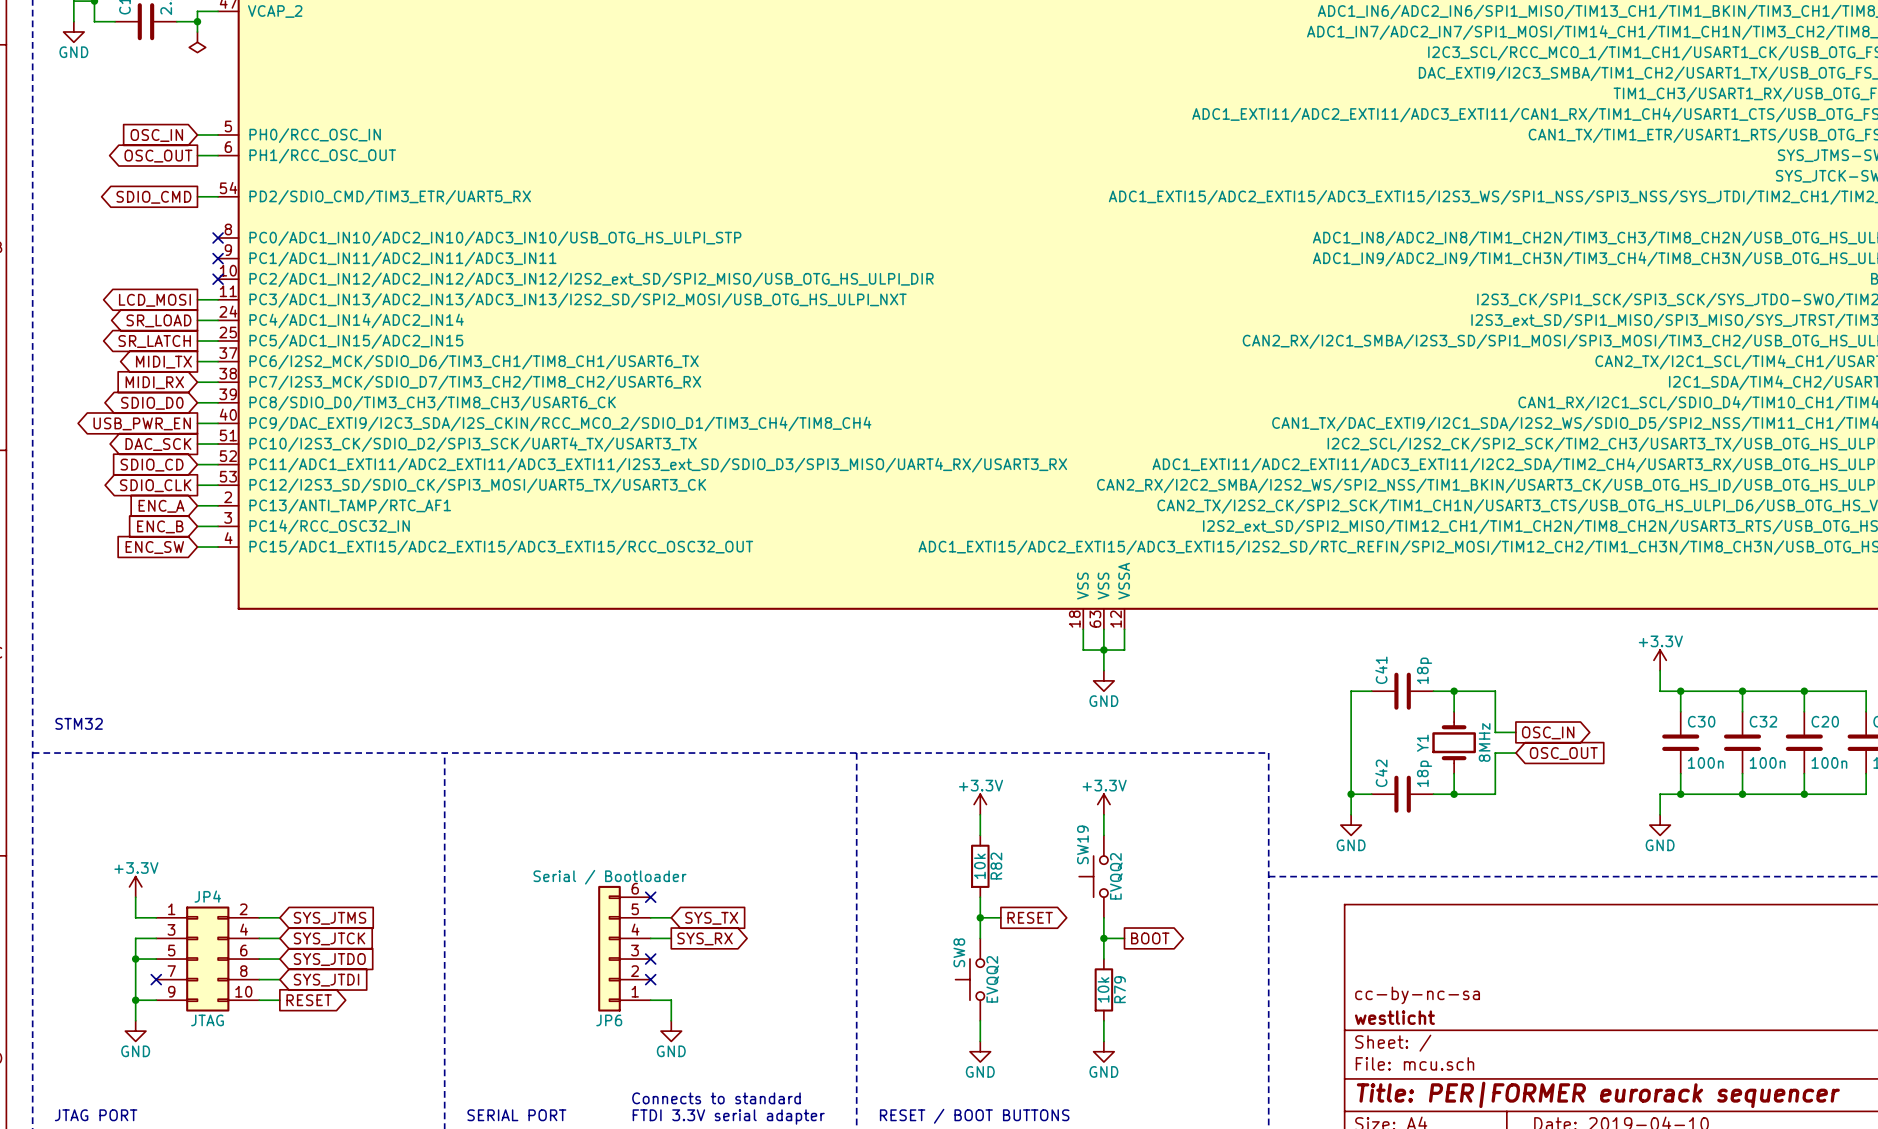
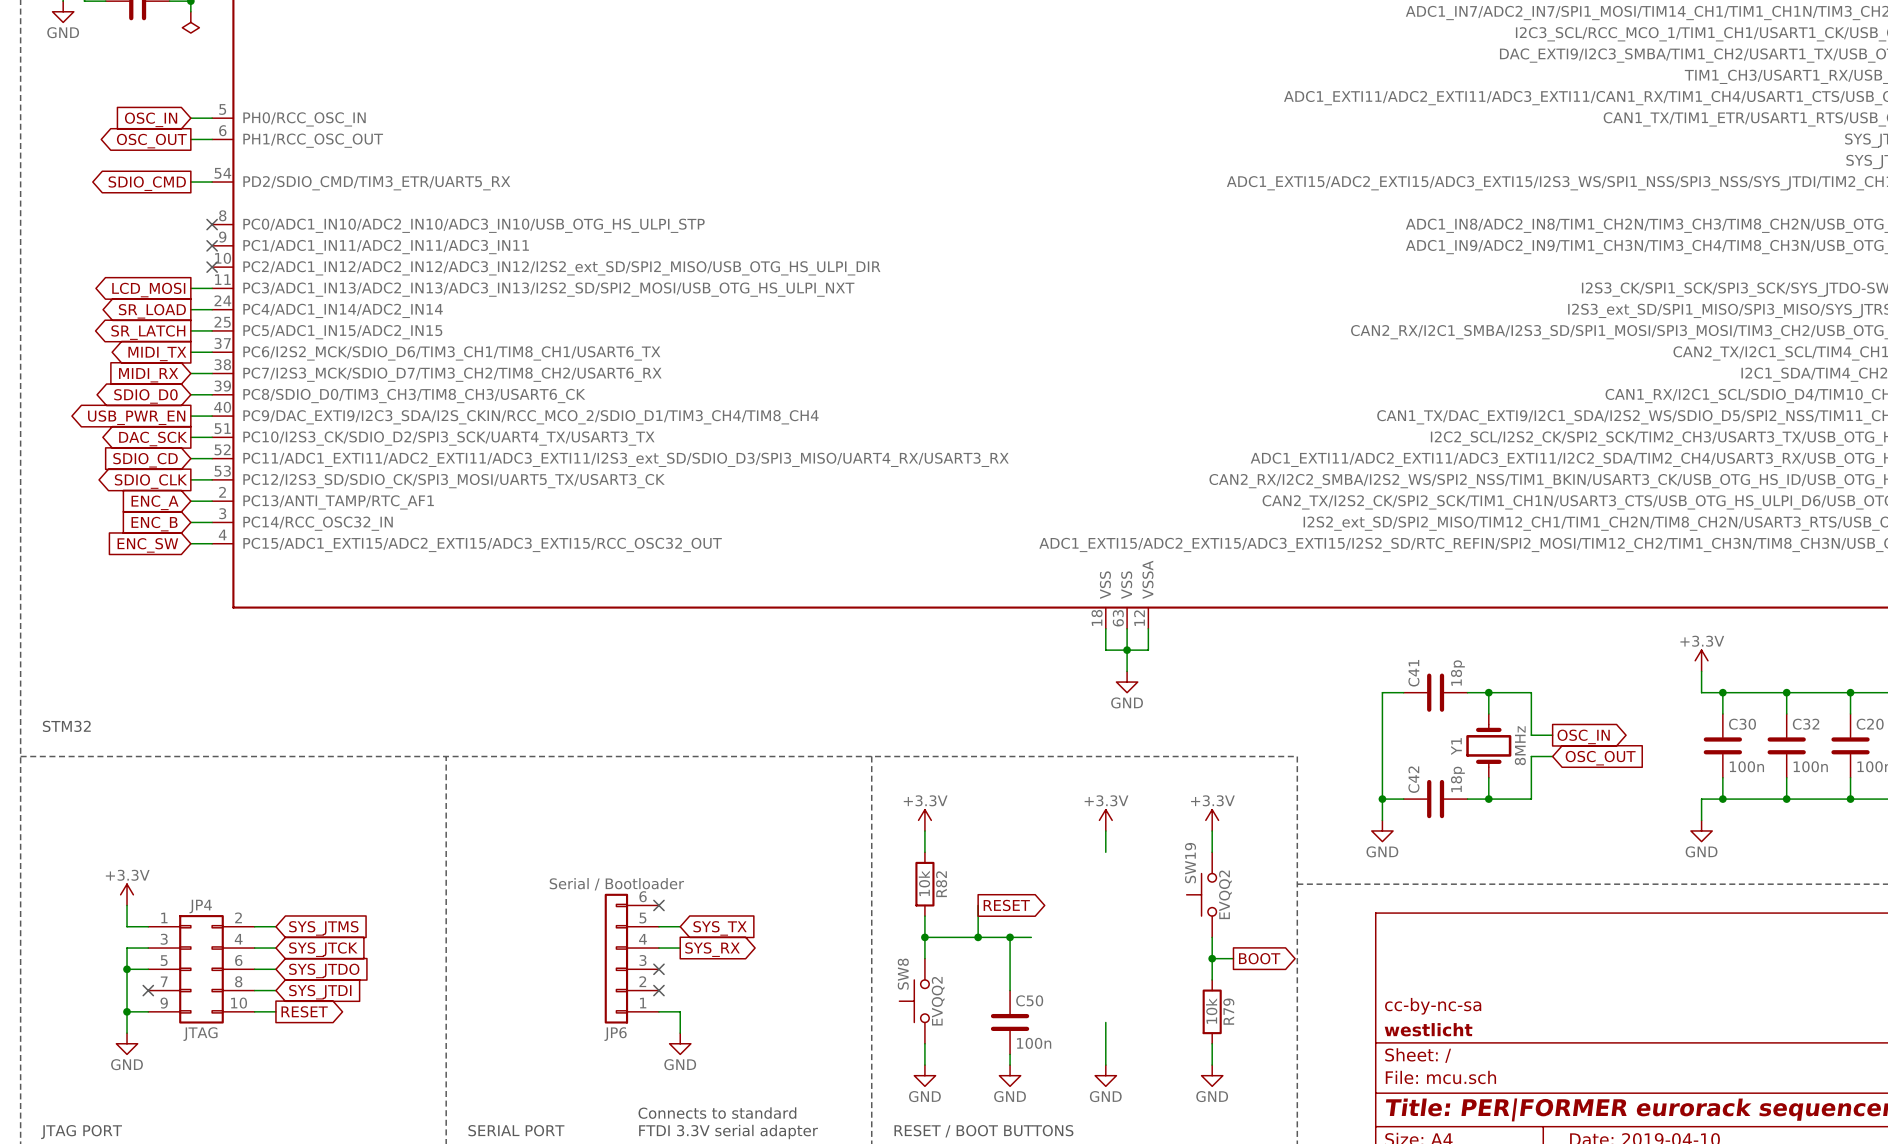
power symbol: +3.3V (980, 804) -> none
power symbol position: +3.3V (1103, 804) -> +3.3V (1105, 820)
power symbol: none -> +3.3V (924, 820)
wire: (980, 814) (980, 835) -> (924, 830) (924, 852)
wire: (1103, 814) (1103, 835) -> (1212, 830) (1212, 852)
power symbol: none -> +3.3V (1212, 820)
wire: none -> (1105, 830) (1105, 852)
R82 position: (980, 866) -> (924, 884)
SW19 position: (1093, 876) -> (1201, 894)
wire: none -> (978, 905) (978, 937)
wire: (980, 897) (980, 938) -> (924, 916) (924, 958)
wire: (980, 917) (1000, 917) -> none
junction: (980, 917) -> none
global label position: RESET (1030, 917) -> RESET (1006, 905)
wire: (1103, 917) (1103, 959) -> (1212, 937) (1212, 979)
wire: none -> (924, 937) (1031, 937)
junction: none -> (924, 937)
junction: none -> (978, 937)
wire: none -> (1010, 937) (1010, 990)
junction: none -> (1010, 937)
wire: (1103, 938) (1124, 938) -> (1212, 958) (1233, 958)
junction: (1103, 938) -> none
global label position: BOOT (1150, 938) -> BOOT (1259, 958)
junction: none -> (1212, 958)
SW8 position: (970, 979) -> (914, 1001)
R79 position: (1103, 989) -> (1212, 1011)
C50: none -> 100n (1010, 1022)
wire: none -> (1105, 1022) (1105, 1065)
wire: (980, 1020) (980, 1041) -> (924, 1043) (924, 1065)
wire: (1103, 1020) (1103, 1041) -> (1212, 1043) (1212, 1065)
wire: none -> (1010, 1054) (1010, 1065)
power symbol position: GND (980, 1051) -> GND (1010, 1075)
power symbol position: GND (1103, 1051) -> GND (1105, 1075)
power symbol: none -> GND (924, 1075)
power symbol: none -> GND (1212, 1075)

